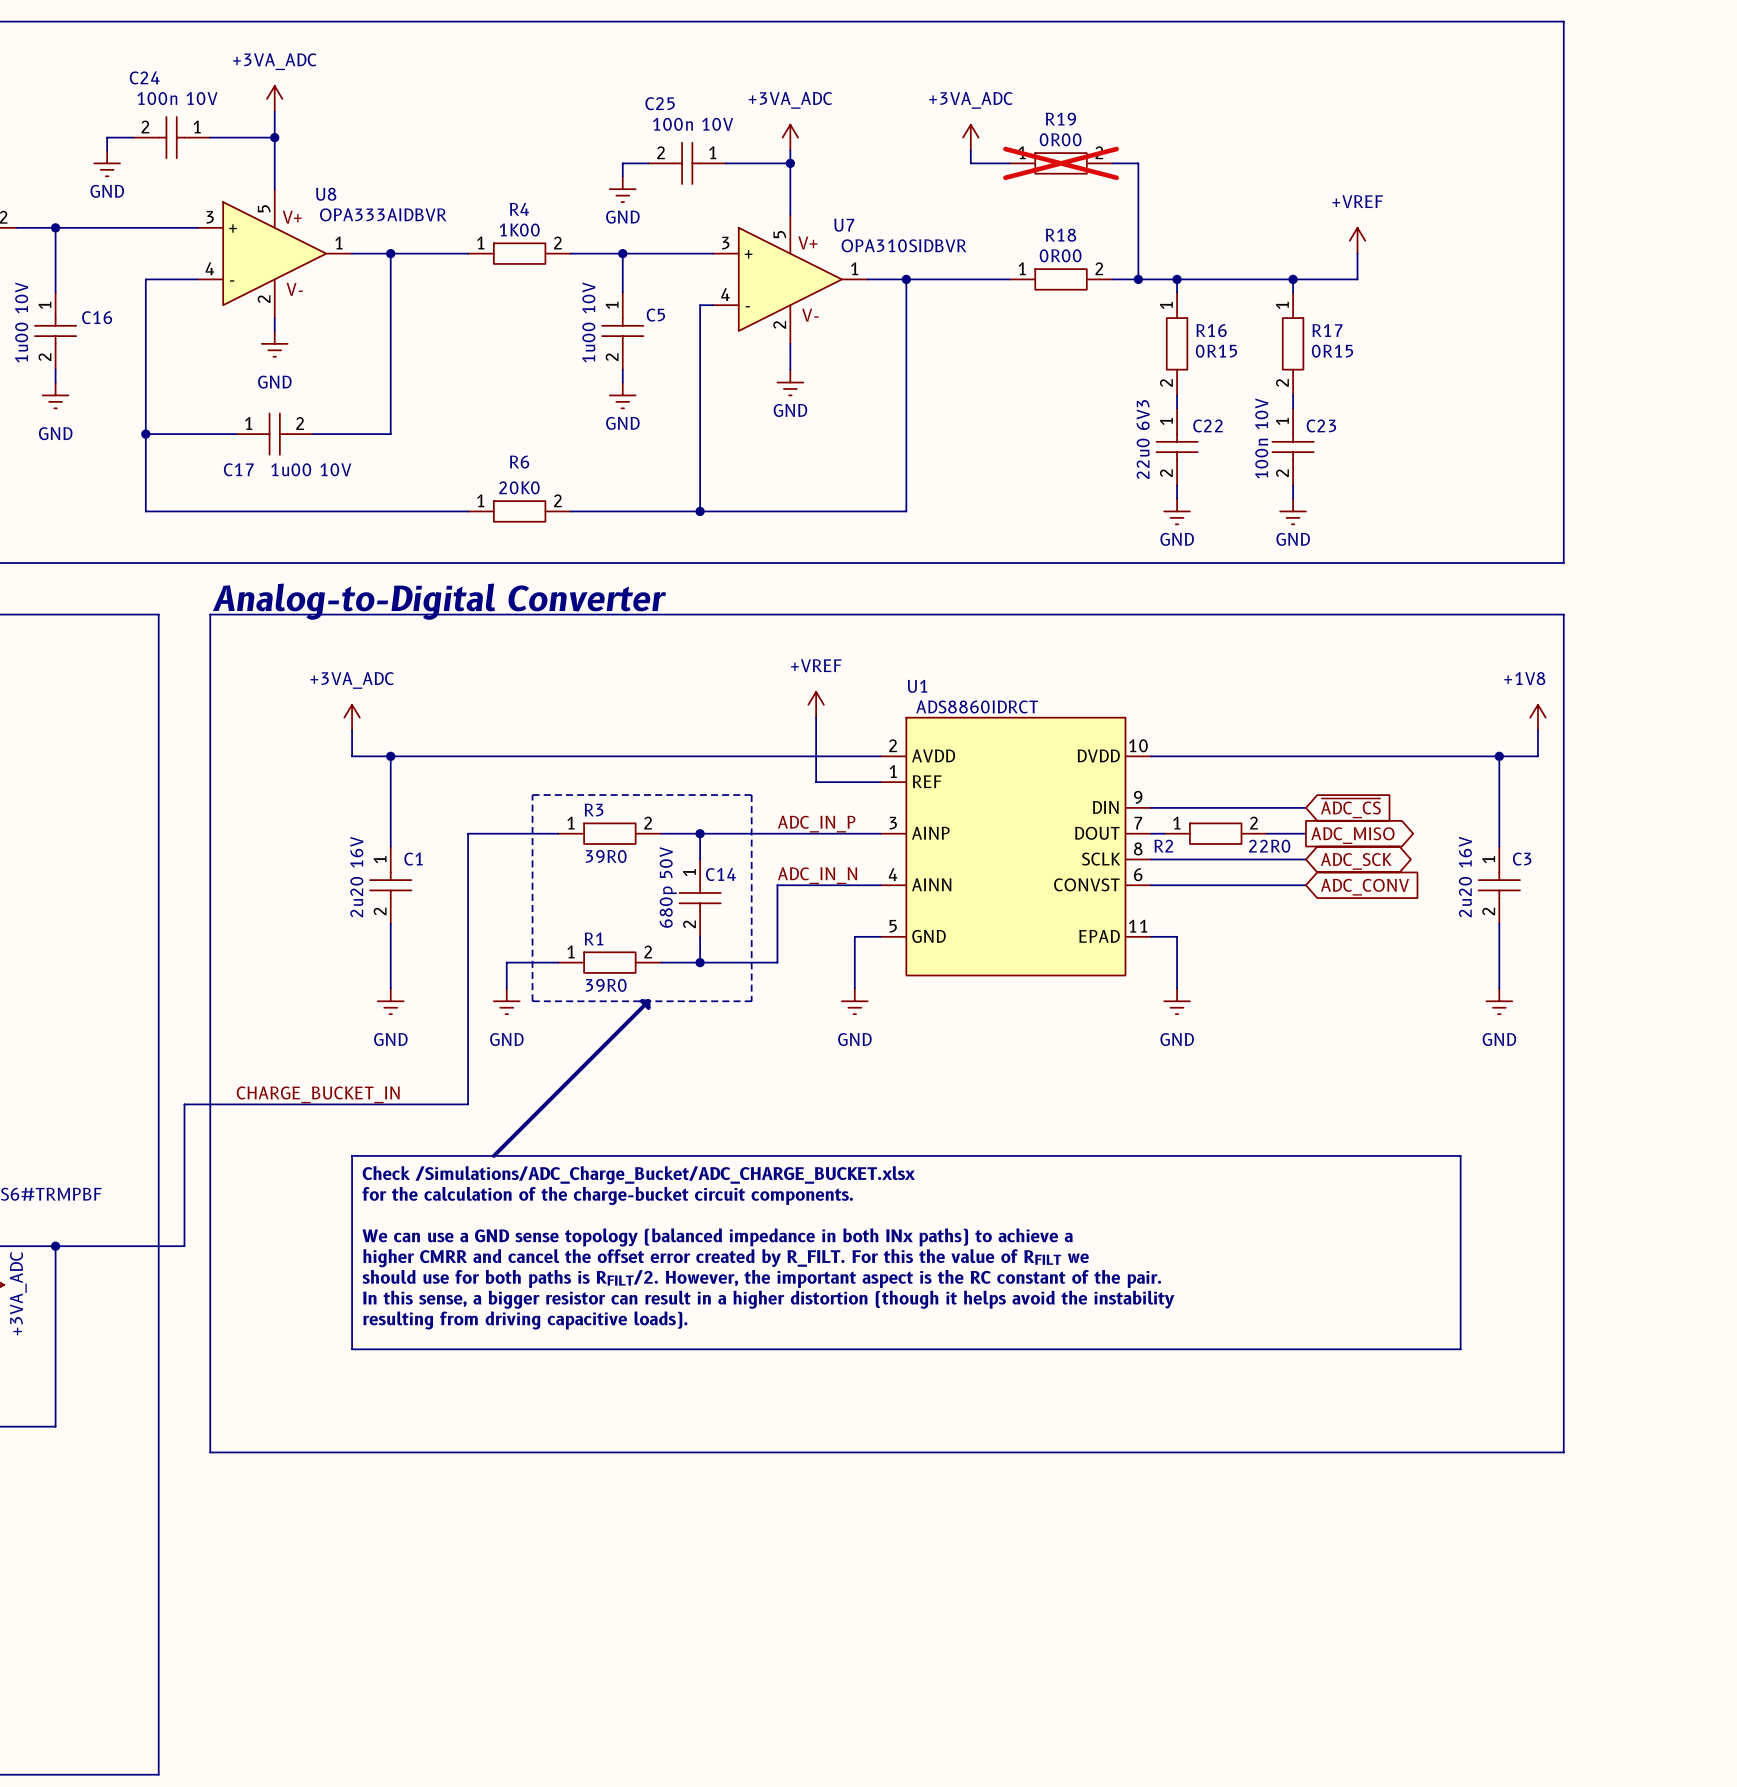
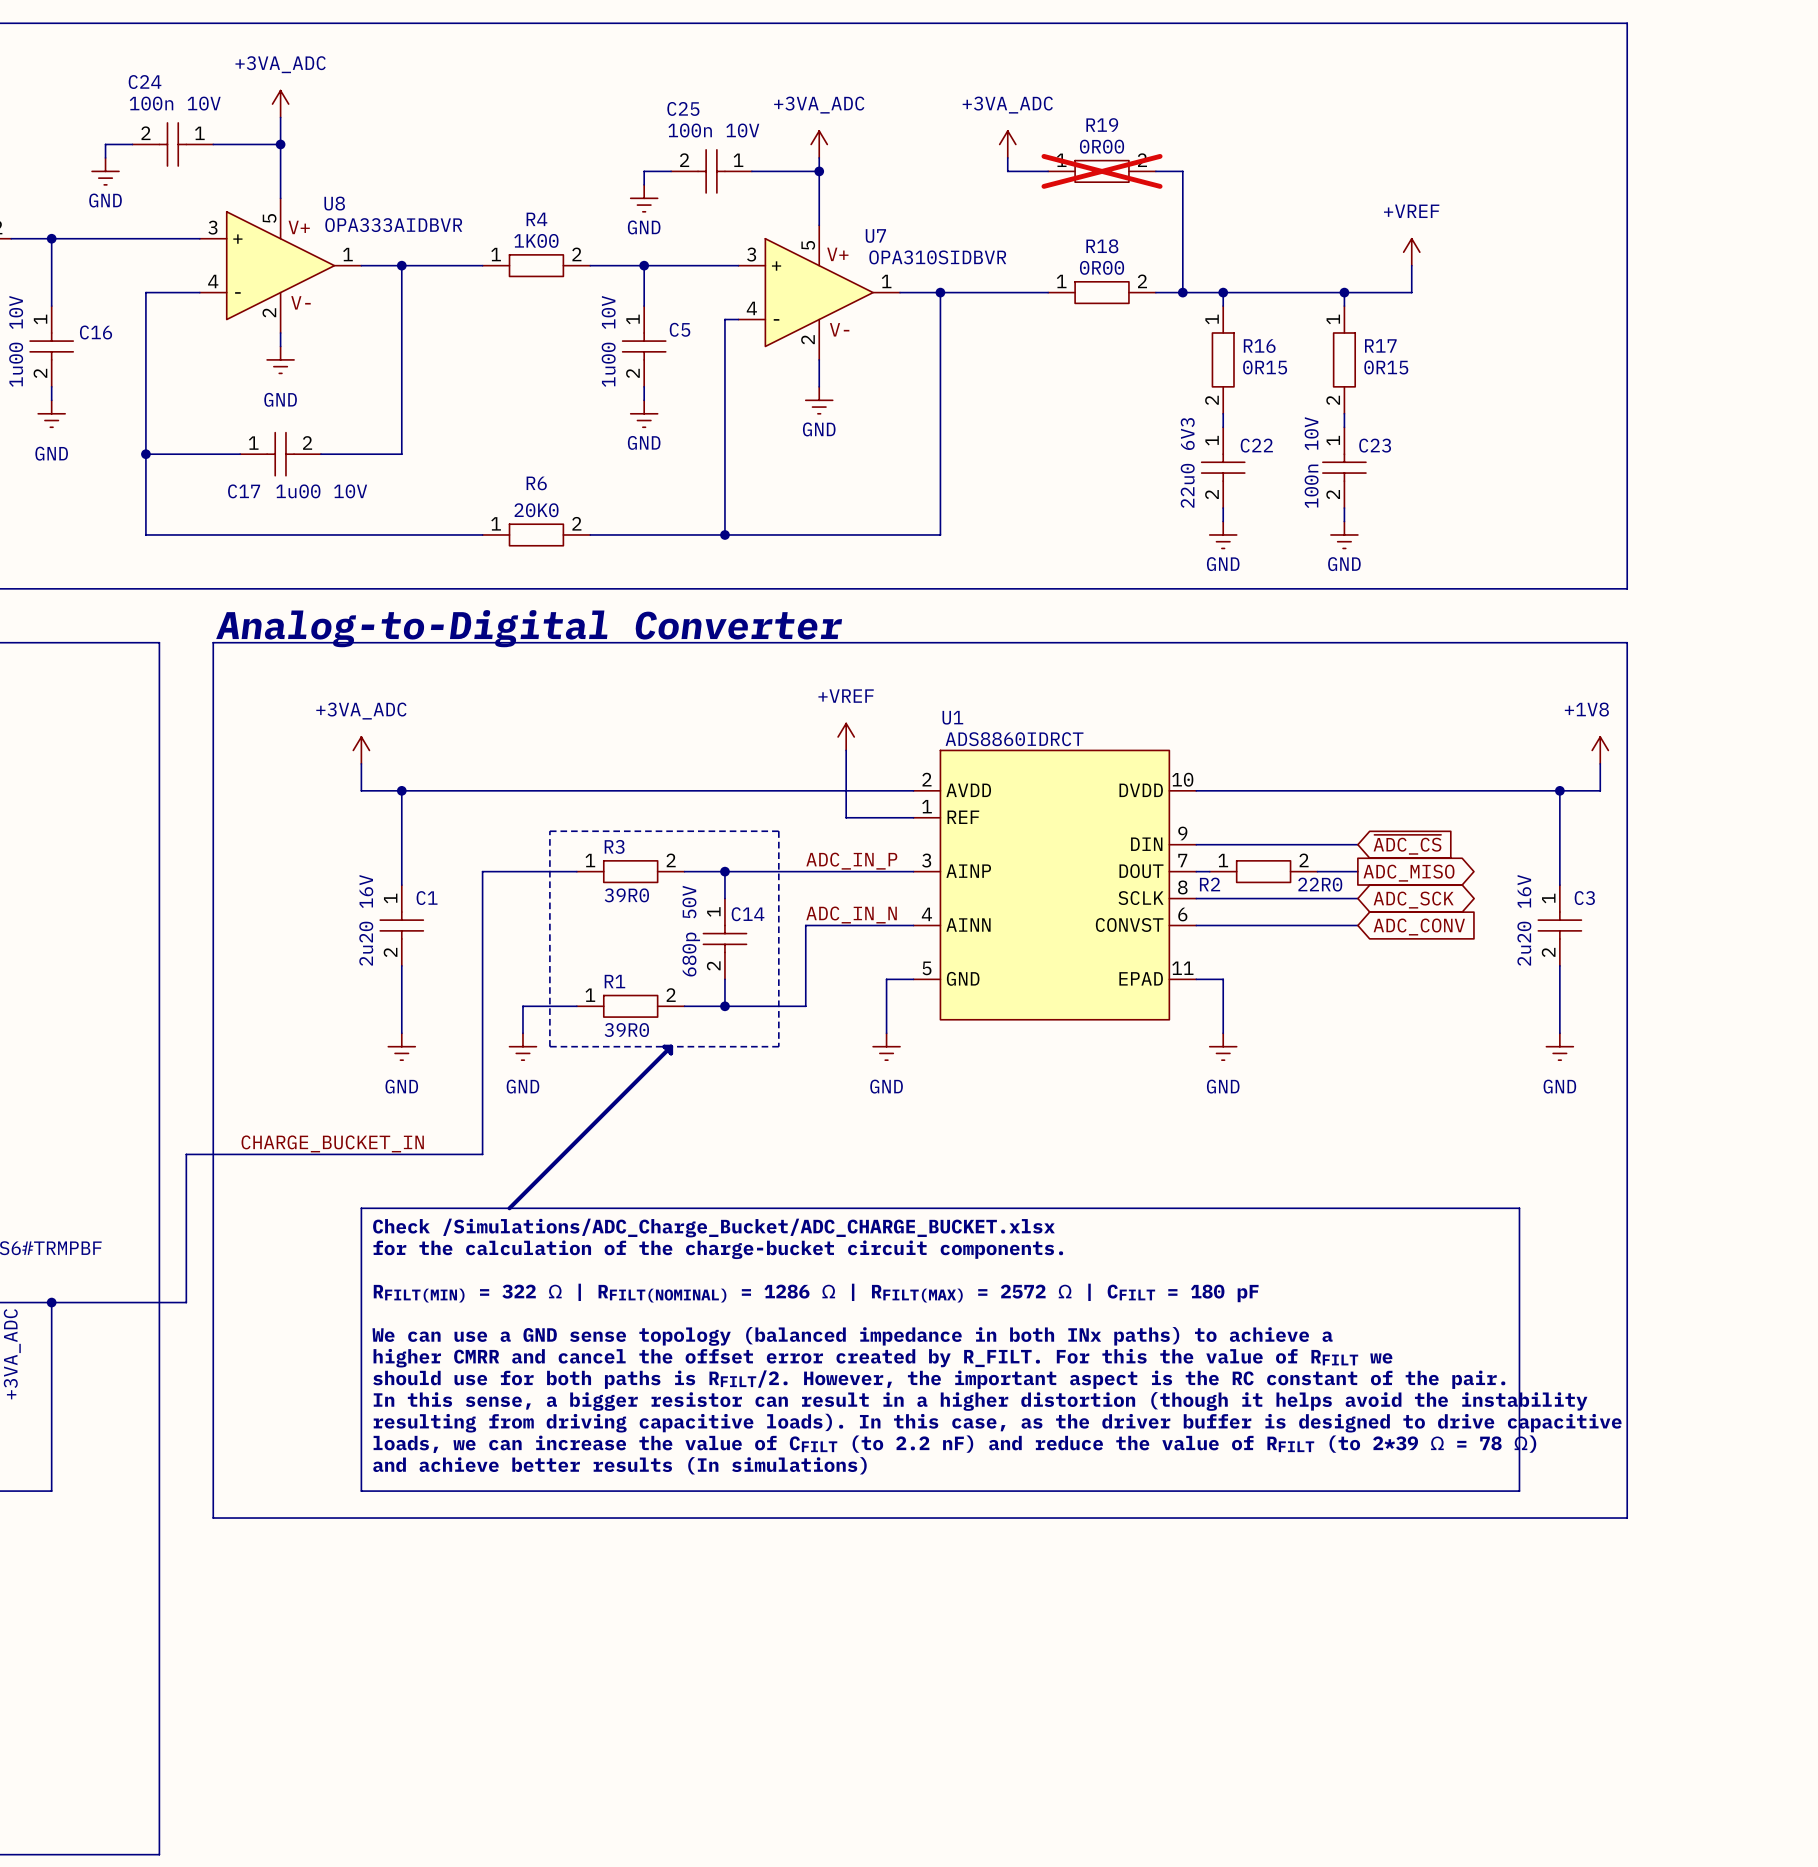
text: We can use a GND sense topology (balanced impedance in both INx paths) to achieve a (717, 1237) -> RFILT(MIN) = 322 Ω | RFILT(NOMINAL) = 1286 Ω | RFILT(MAX) = 2572 Ω | CFILT = 180 pF (816, 1293)
text: higher CMRR and cancel the offset error created by R_FILT. For this the value of RFILT we (726, 1258) -> none
text: should use for both paths is RFILT/2. However, the important aspect is the RC constant of the pair. (761, 1278) -> We can use a GND sense topology (balanced impedance in both INx paths) to achieve a (852, 1336)
text: In this sense, a bigger resistor can result in a higher distortion (though it helps avoid the instability (768, 1299) -> higher CMRR and cancel the offset error created by R_FILT. For this the value of RFILT we (882, 1358)
text: resulting from driving capacitive loads). (525, 1320) -> should use for both paths is RFILT/2. However, the important aspect is the RC constant of the pair. (939, 1379)
text: none -> In this sense, a bigger resistor can result in a higher distortion (though it helps avoid the instability (980, 1401)
line: (352, 1349) (1460, 1349) -> (361, 1410) (361, 1491) (1519, 1491) (1519, 1410)
text: none -> resulting from driving capacitive loads). In this case, as the driver buffer is designed to drive capacitive (997, 1423)
text: none -> loads, we can increase the value of CFILT (to 2.2 nF) and reduce the value of RFILT (to 2*39 Ω = 78 Ω) (954, 1444)
text: none -> and achieve better results (In simulations) (620, 1465)

